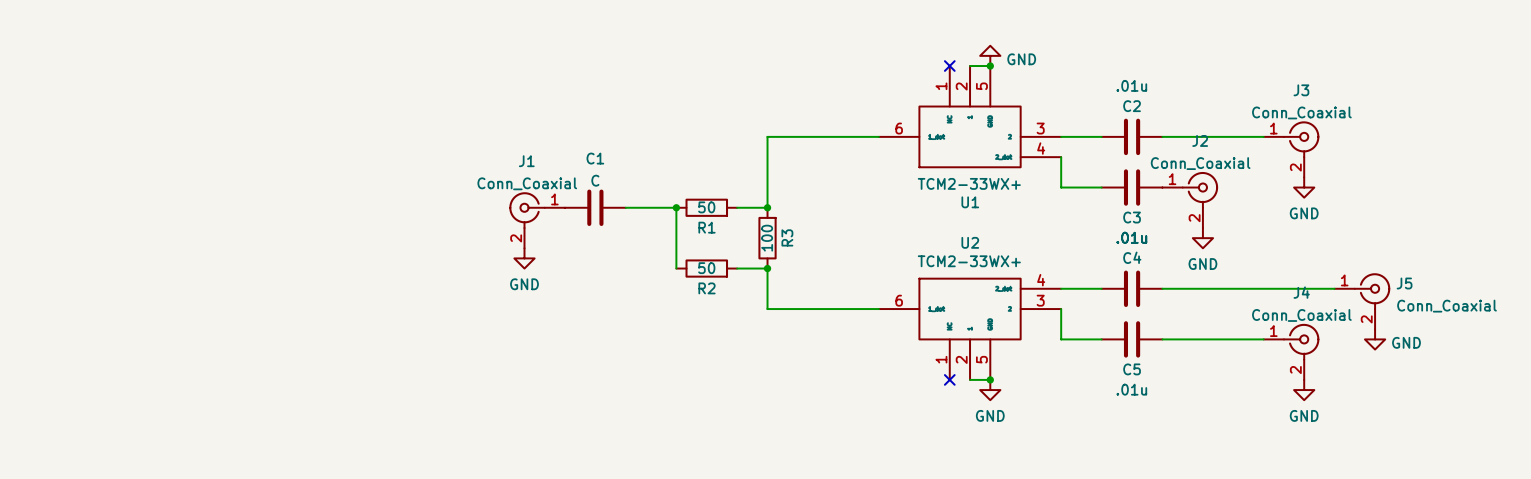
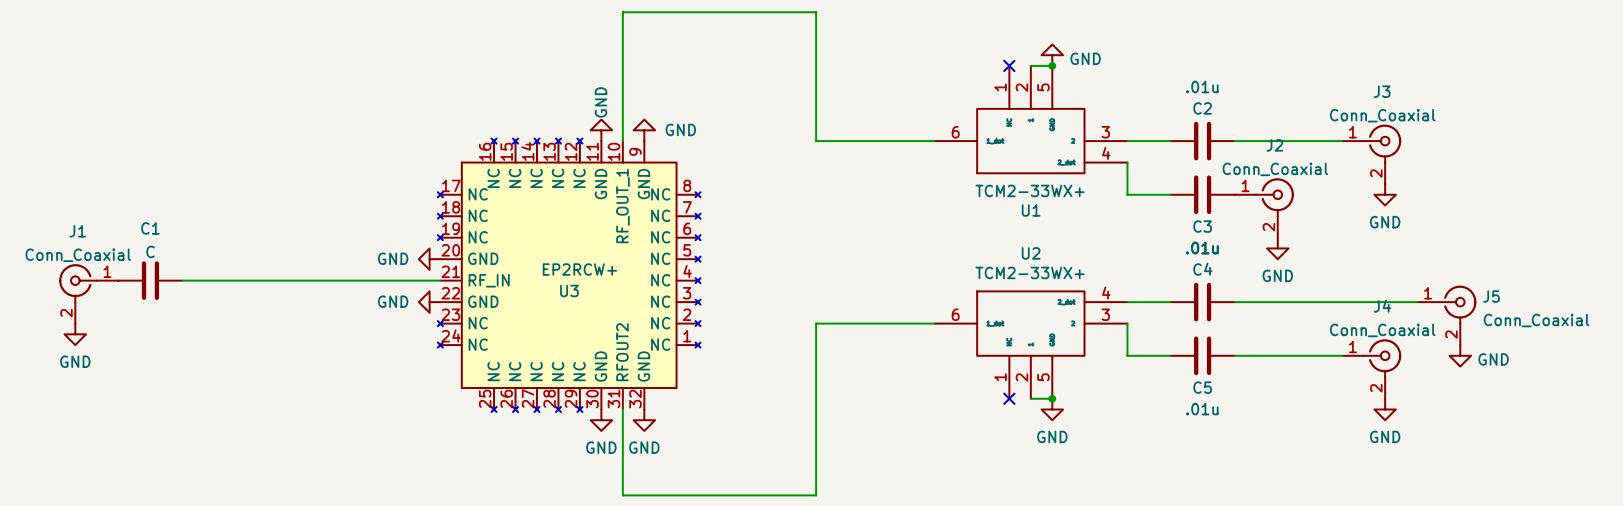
power symbol: none -> GND (601, 130)
power symbol: none -> GND (644, 130)
wire: (767, 136) (767, 207) (737, 207) -> (816, 141) (816, 12) (622, 12) (622, 141)
C1 position: (595, 207) -> (150, 280)
wire: (625, 207) (676, 207) (676, 268) -> none
junction: (676, 207) -> none
R1: 50 (706, 207) -> none
junction: (767, 207) -> none
J1 position: (537, 220) -> (88, 293)
R3: 100 (767, 238) -> none
power symbol: none -> GND (429, 259)
power symbol: GND (524, 258) -> none
U3: none -> EP2RCW+ (569, 275)
wire: none -> (182, 280) (440, 280)
R2: 50 (706, 268) -> none
wire: (737, 268) (767, 268) (767, 309) -> (622, 409) (622, 495) (816, 495) (816, 323)
junction: (767, 268) -> none
power symbol: none -> GND (429, 302)
power symbol: none -> GND (75, 334)
power symbol: none -> GND (601, 420)
power symbol: none -> GND (644, 420)

